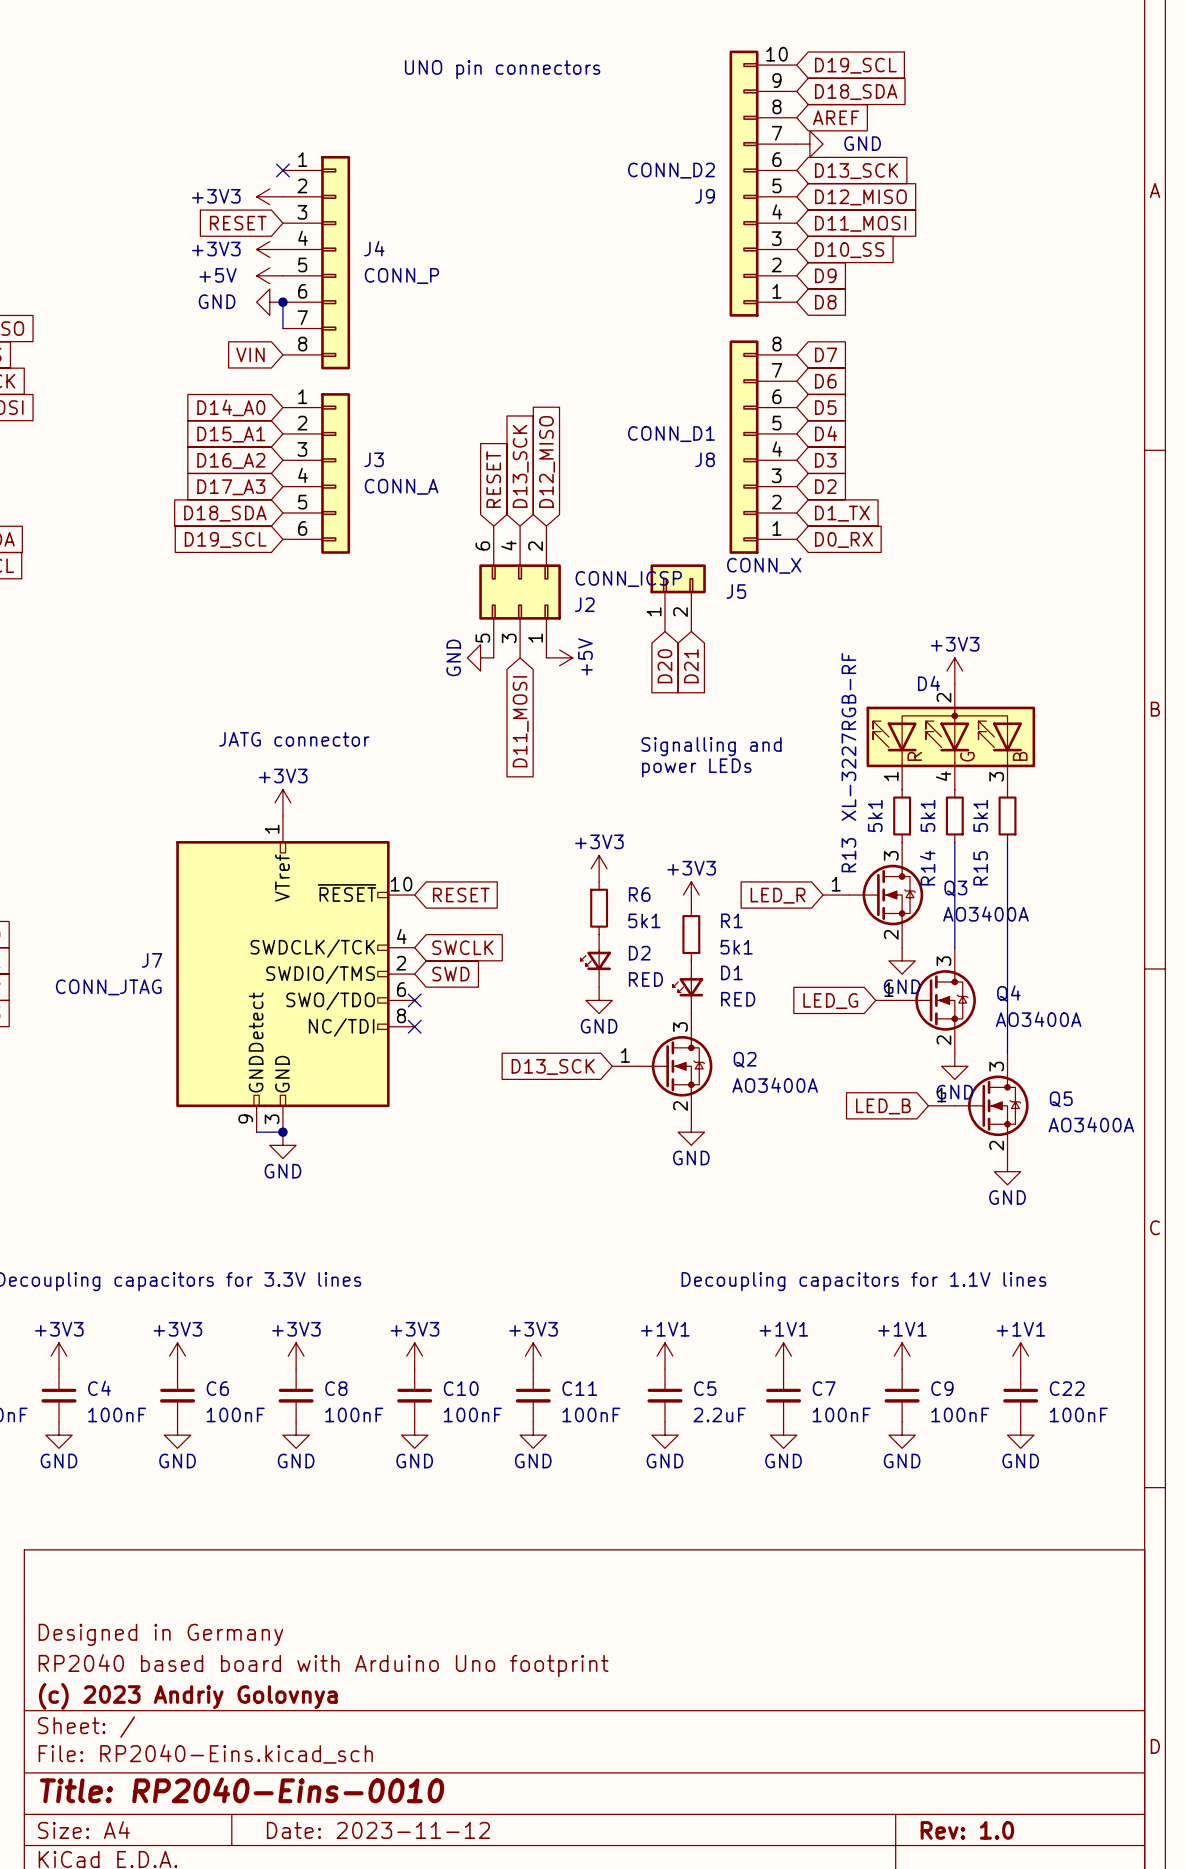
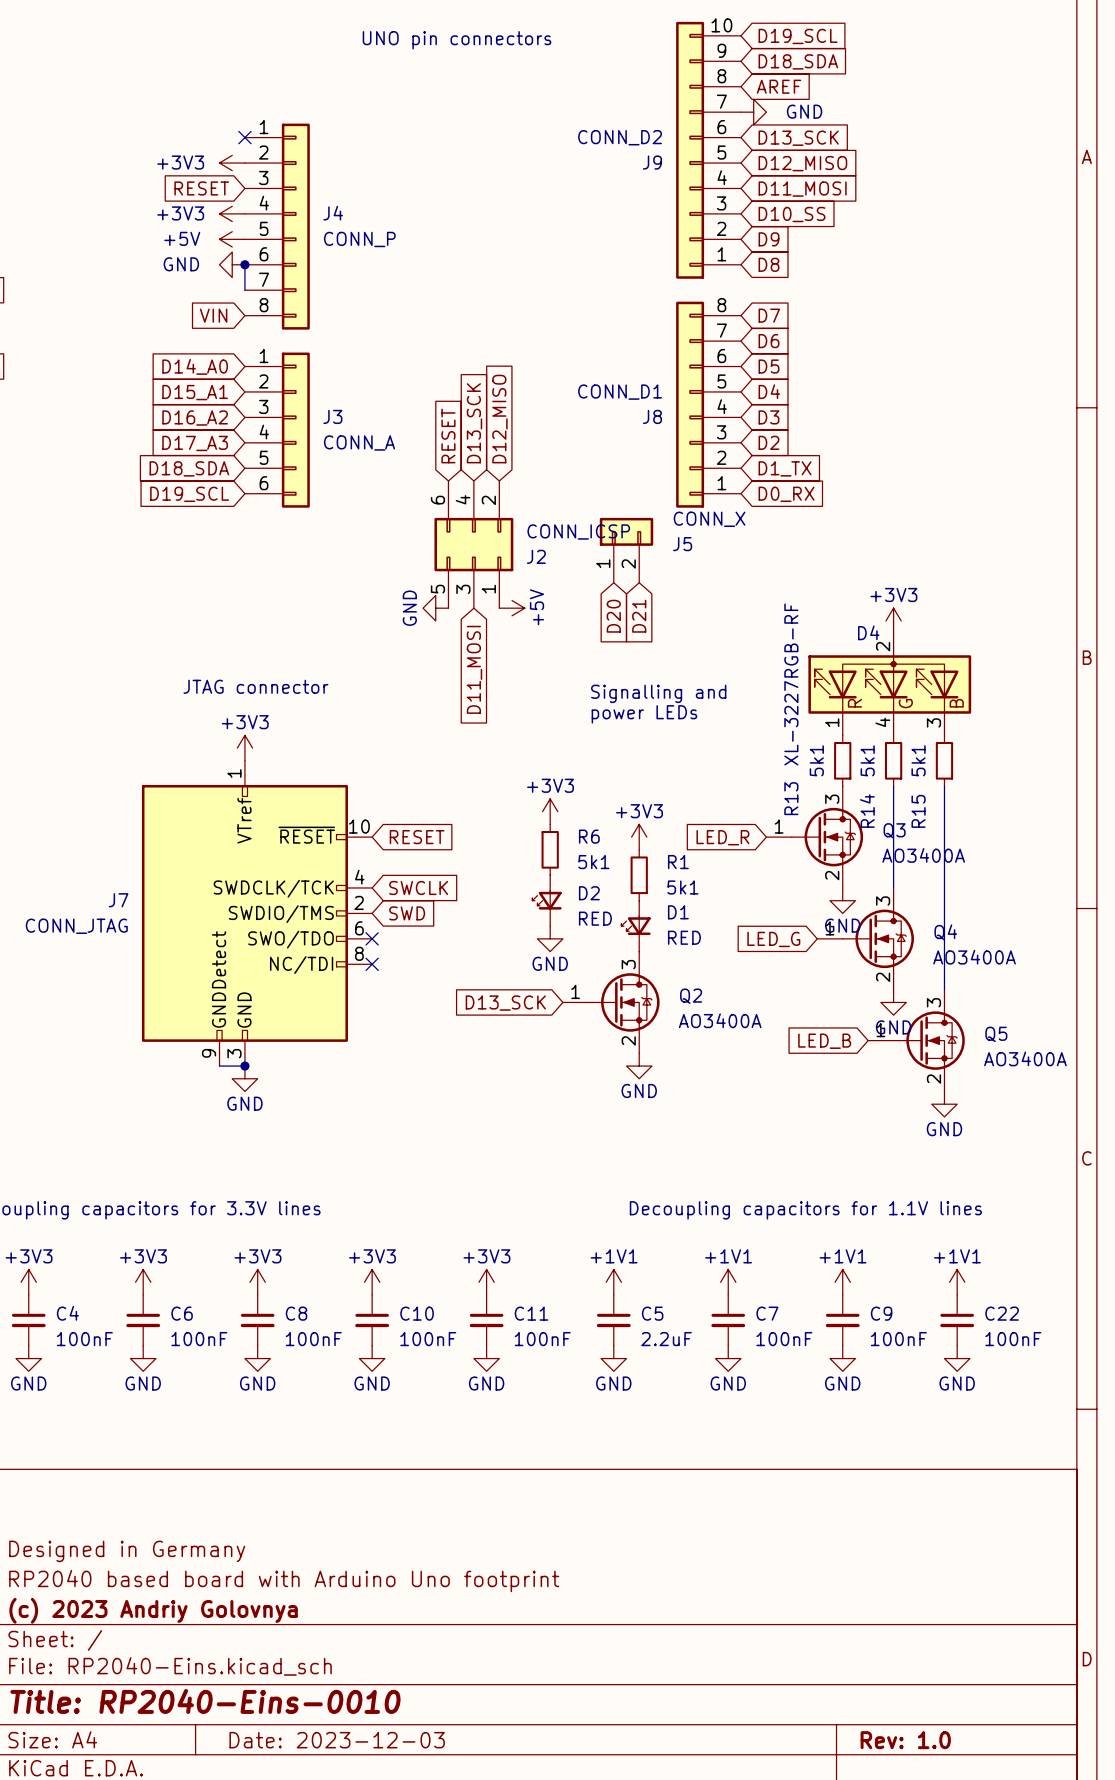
text: JATG connector (294, 739) -> JTAG connector (255, 686)
title block: Date: 2023-11-12 (378, 1830) -> Date: 2023-12-03 (337, 1740)

